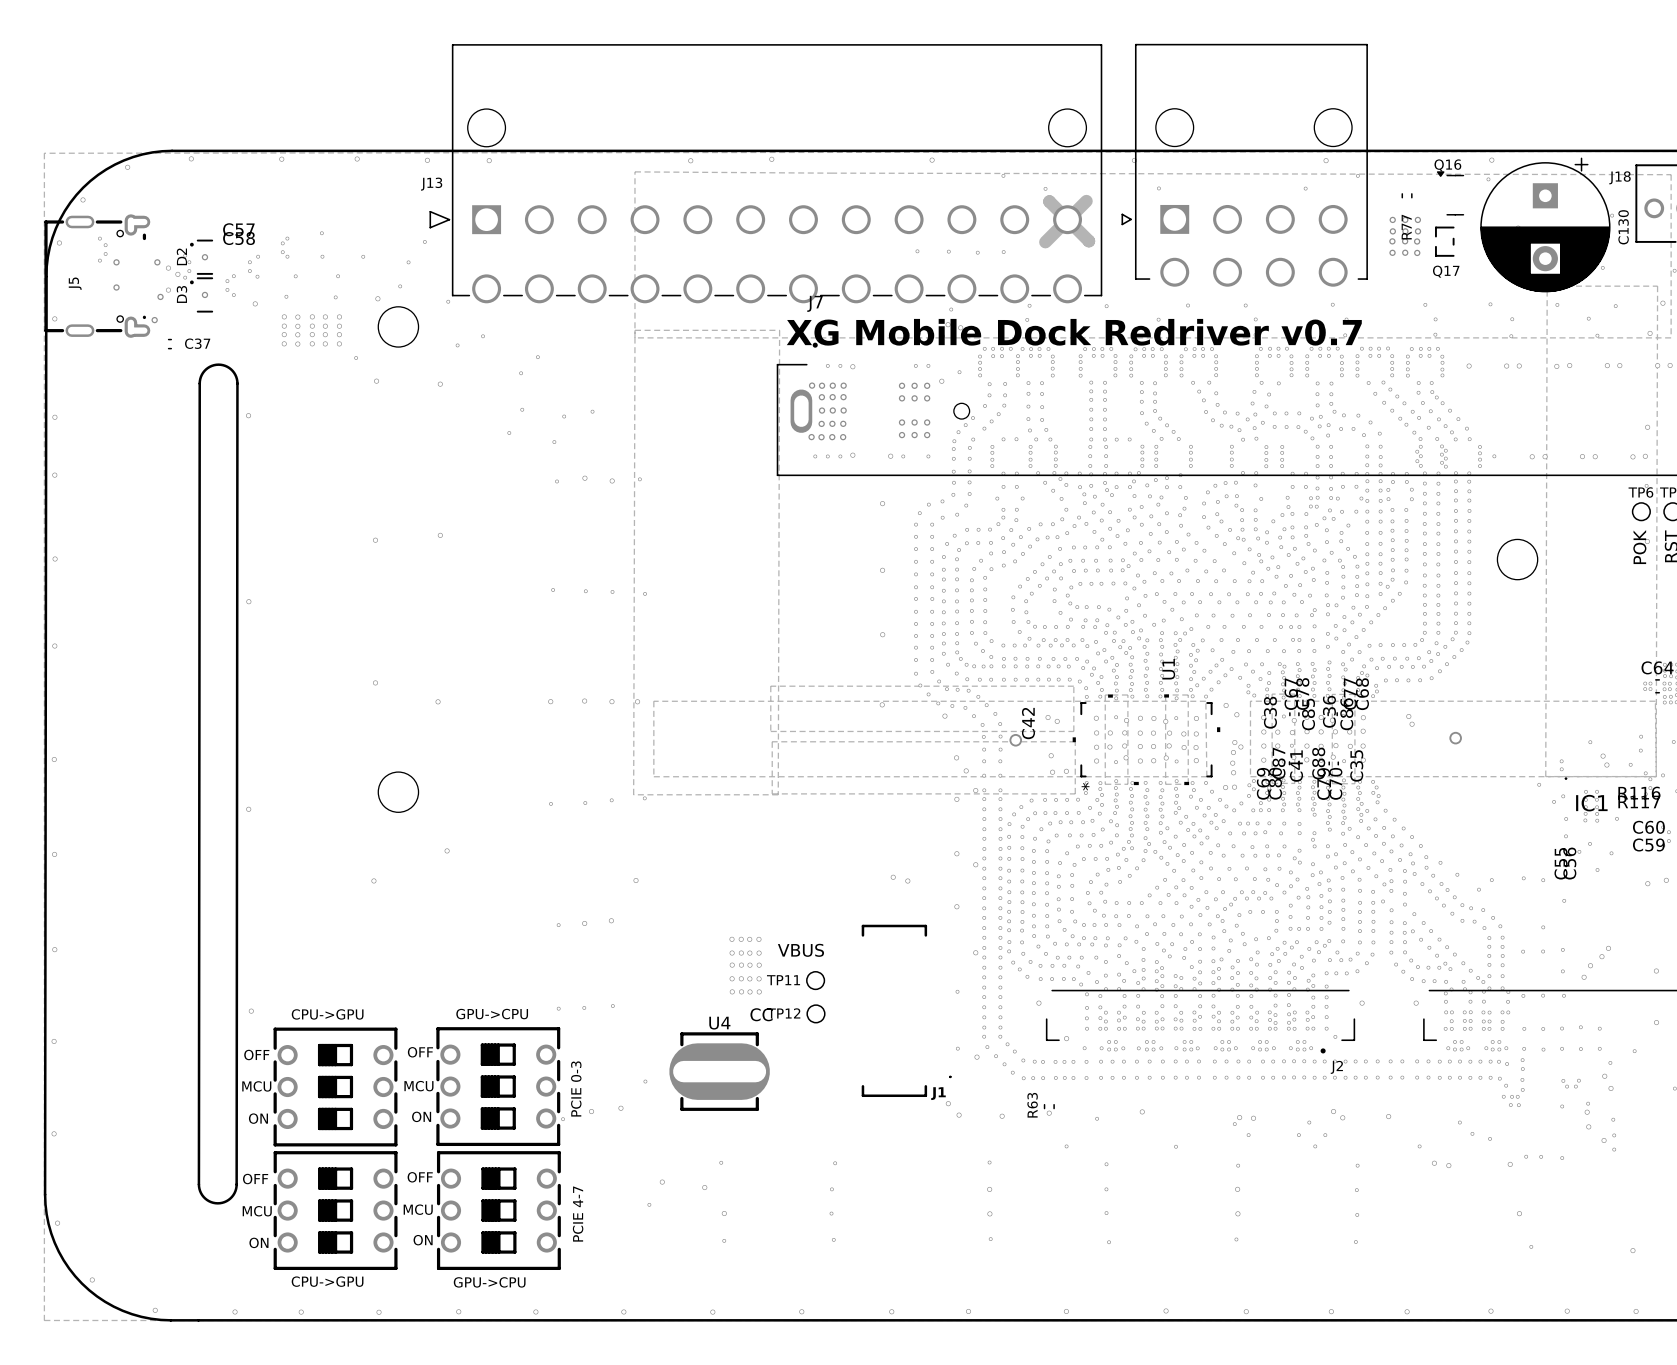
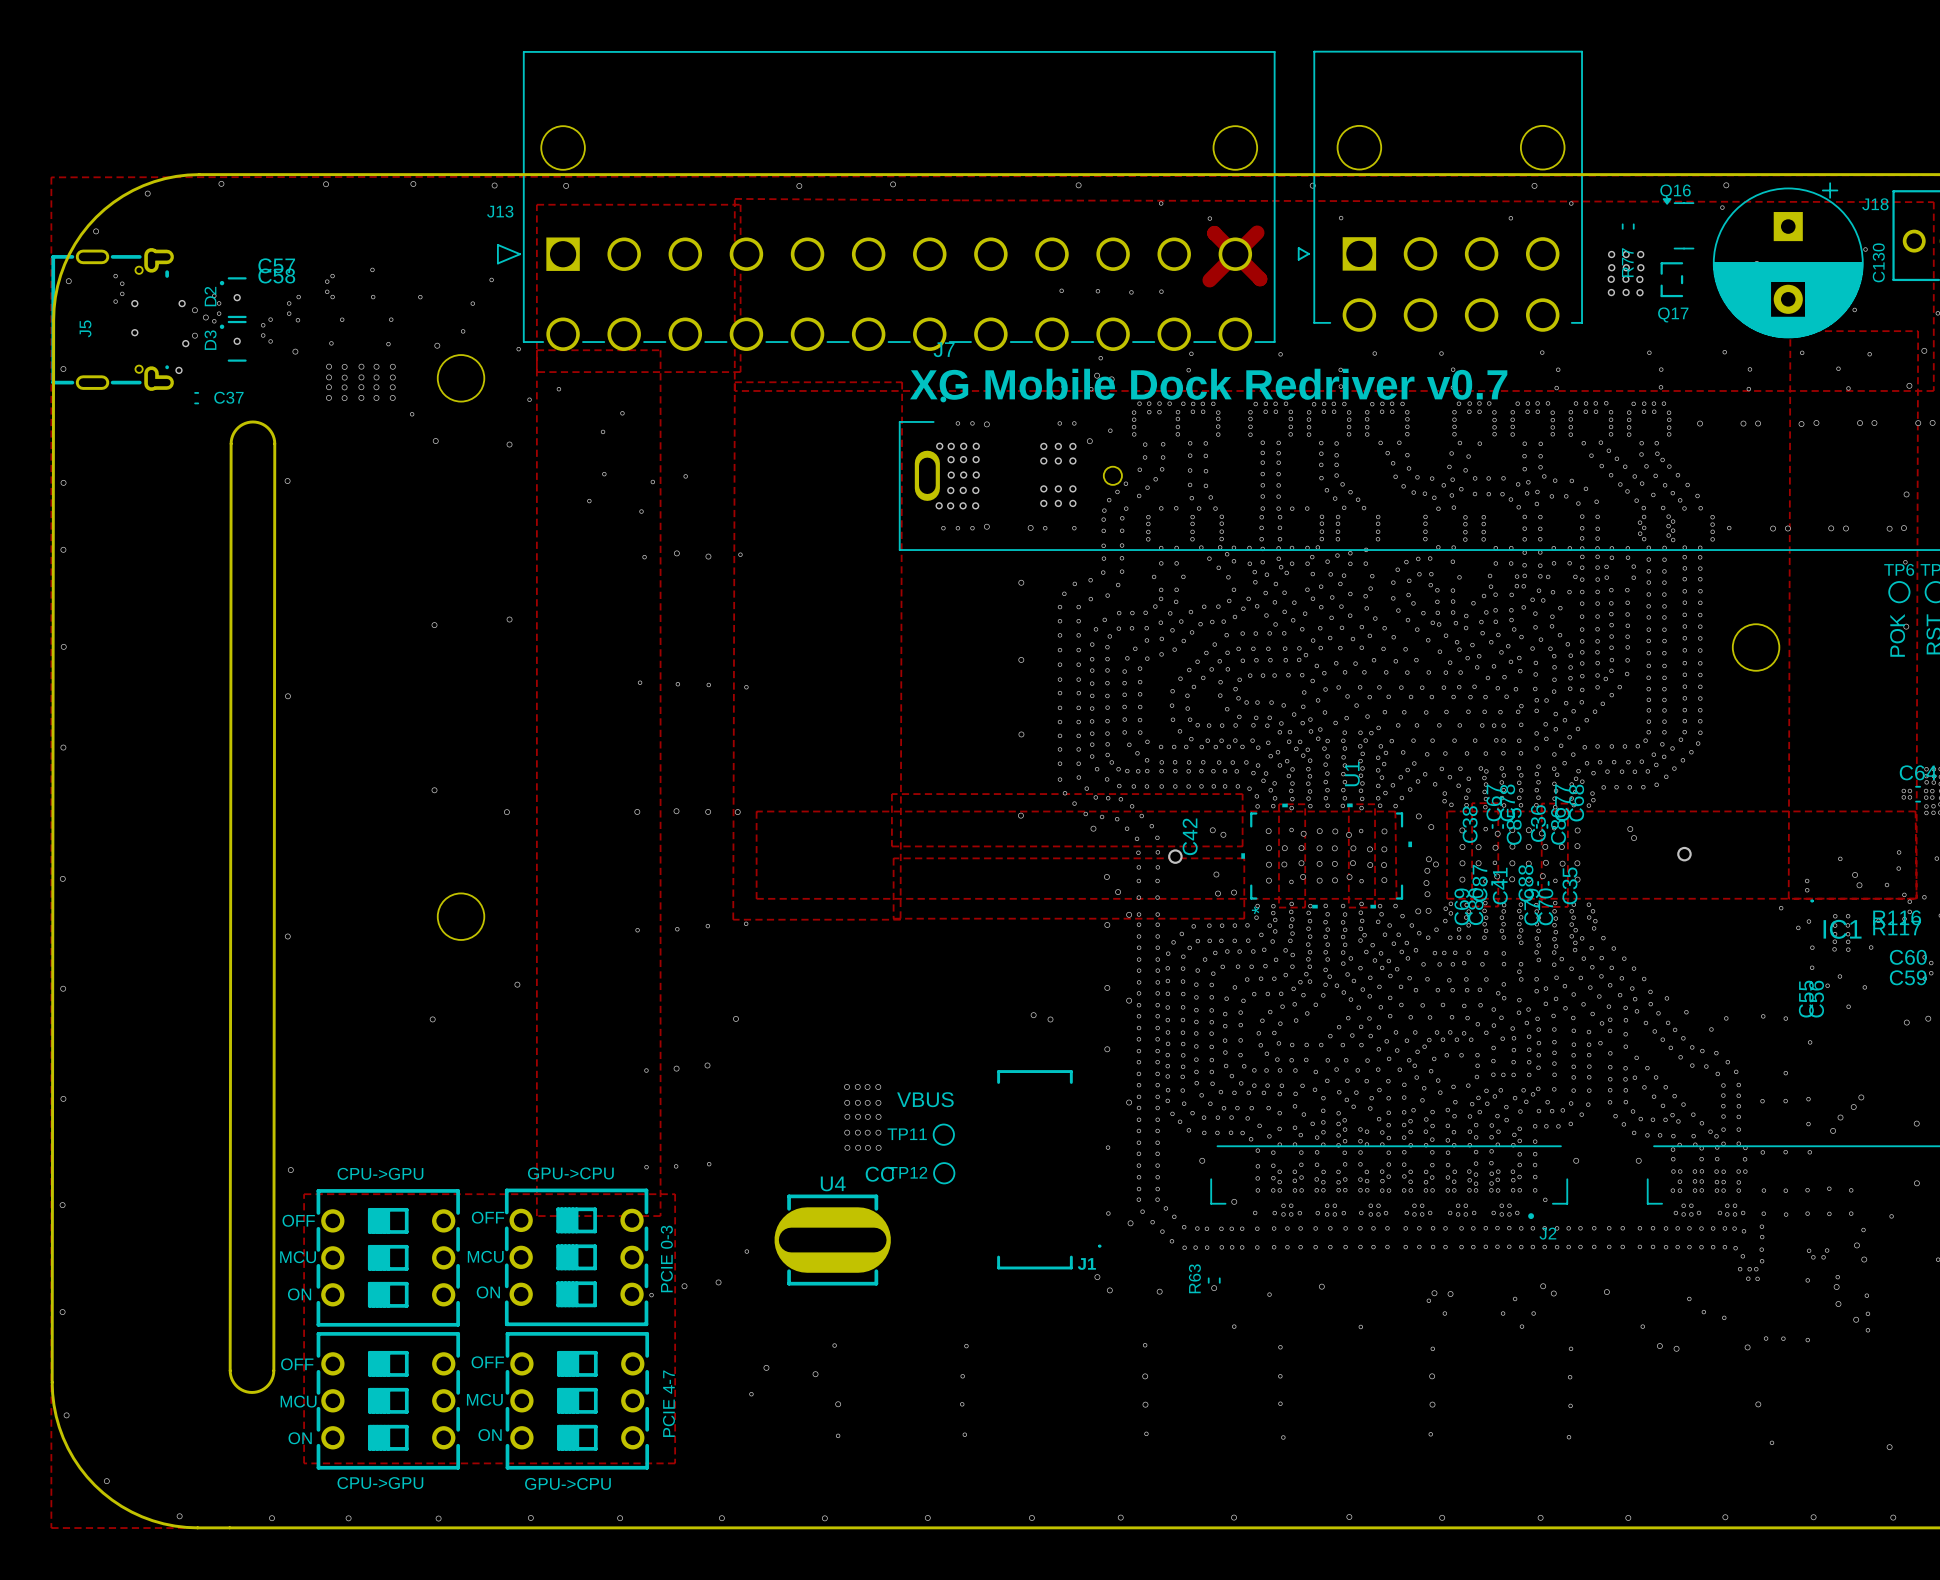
zone outline: none -> (536, 350) (660, 350) (660, 1216) (536, 1216) (536, 204) (740, 204) (740, 372) (536, 372)
zone outline: none -> (304, 1194) (304, 1463) (675, 1463) (675, 1194) (304, 1194)

